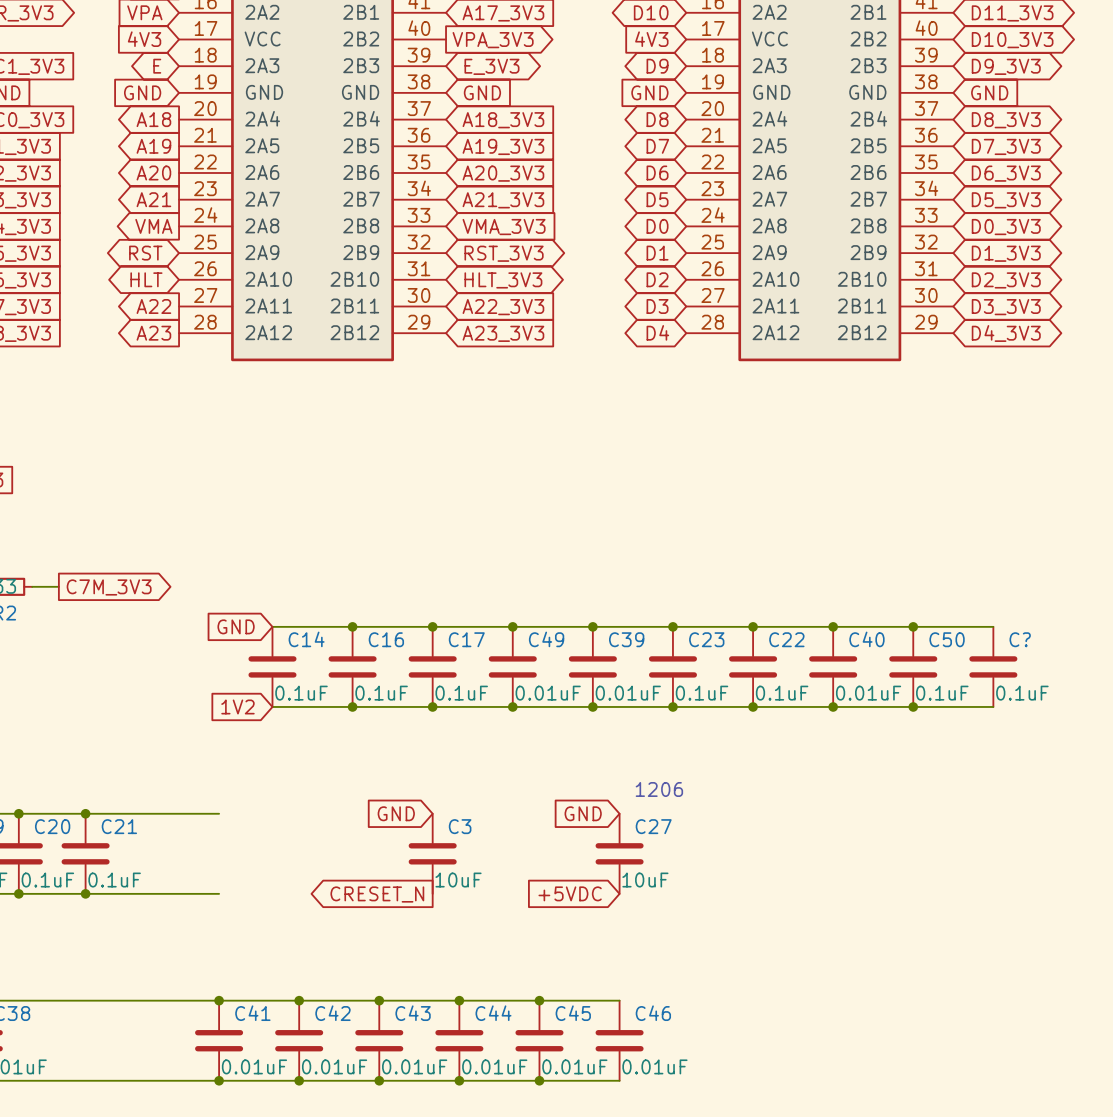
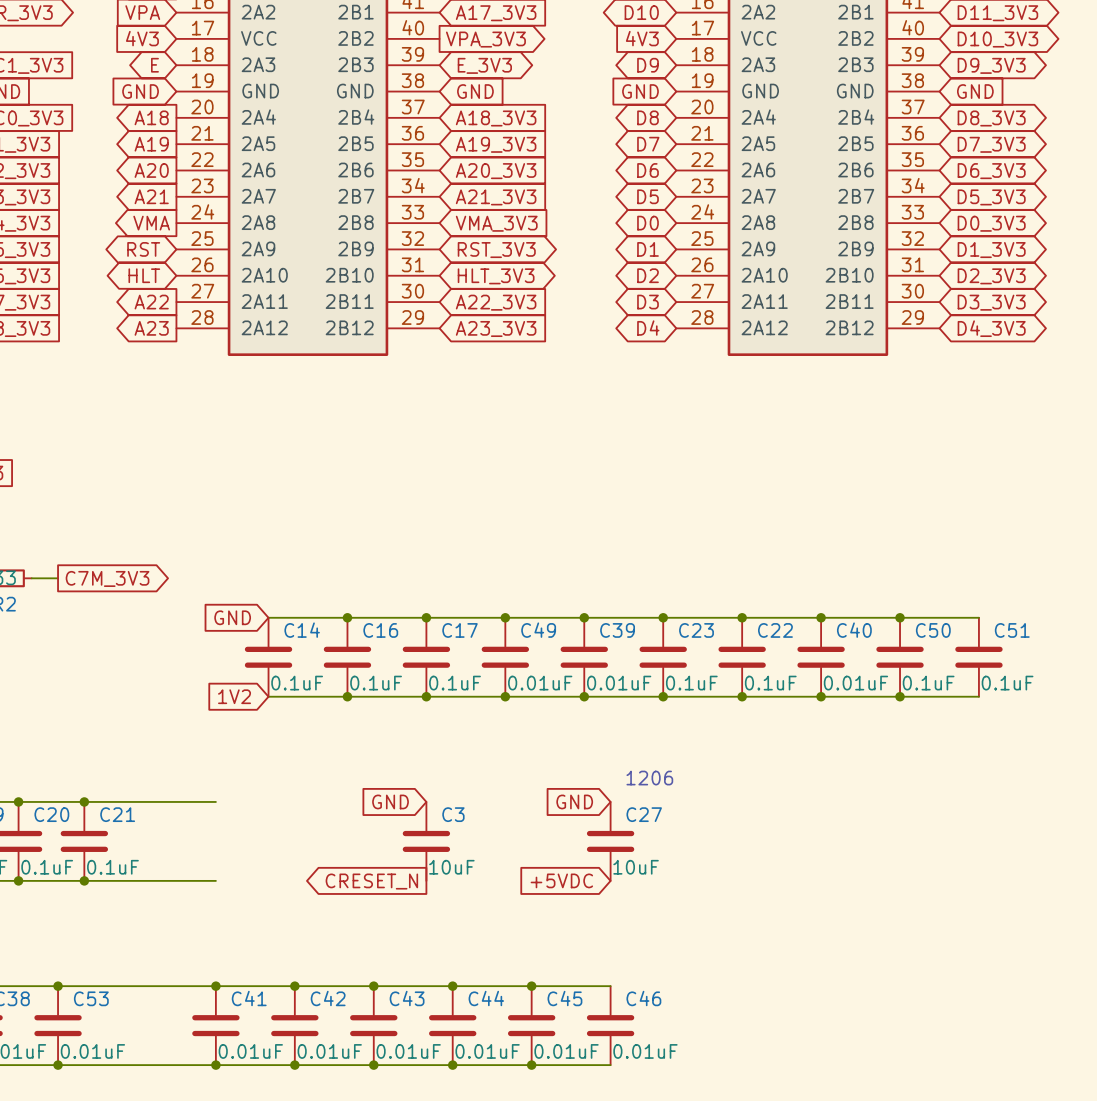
C? name: C? (1020, 639) -> C51 (1012, 630)
junction: none -> (58, 986)
C53: none -> 0.01uF (58, 1025)
junction: none -> (58, 1065)

